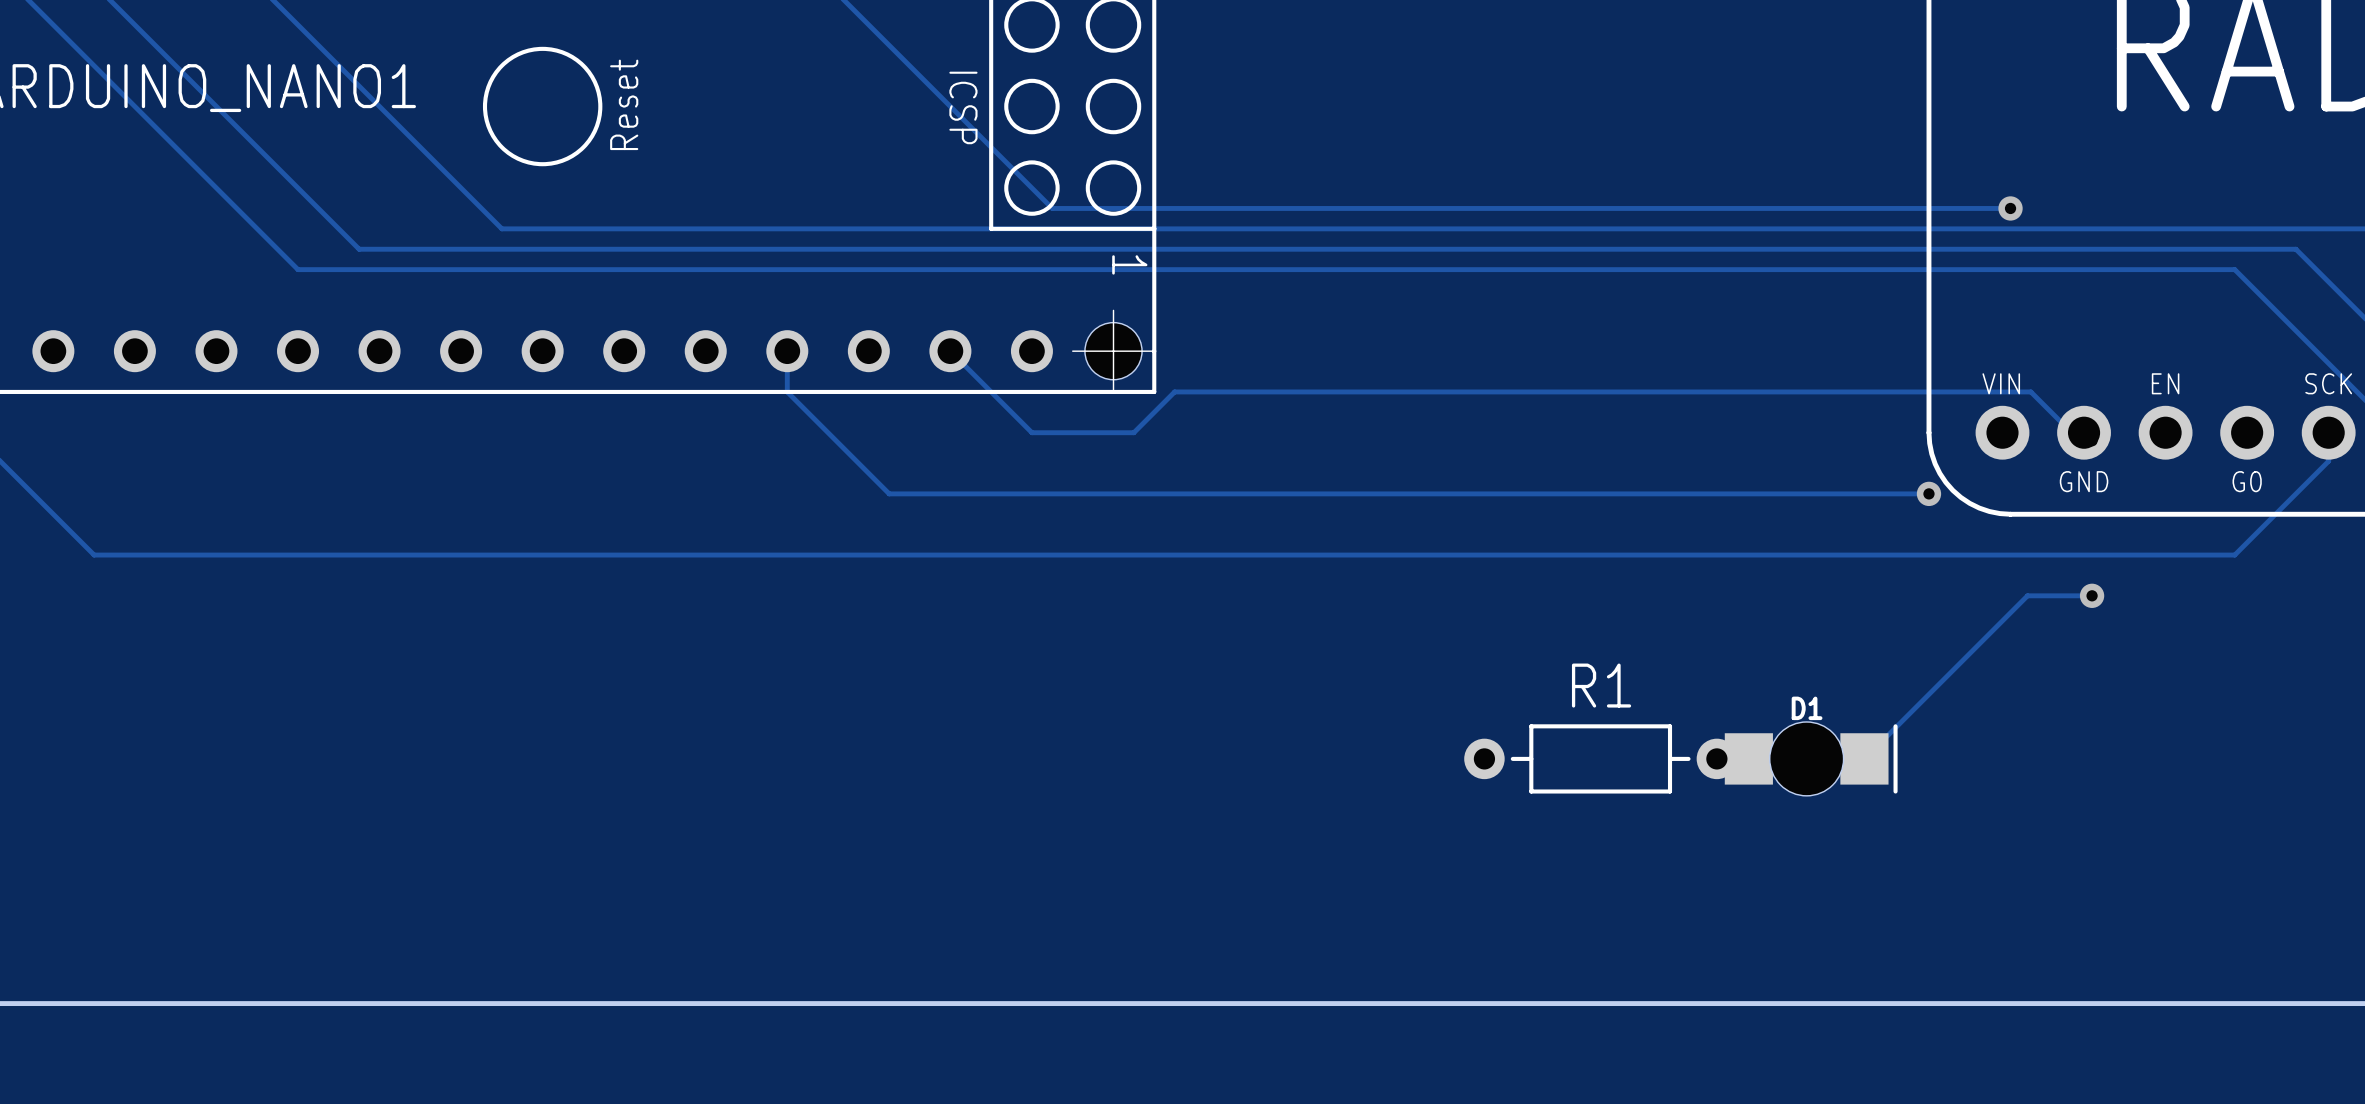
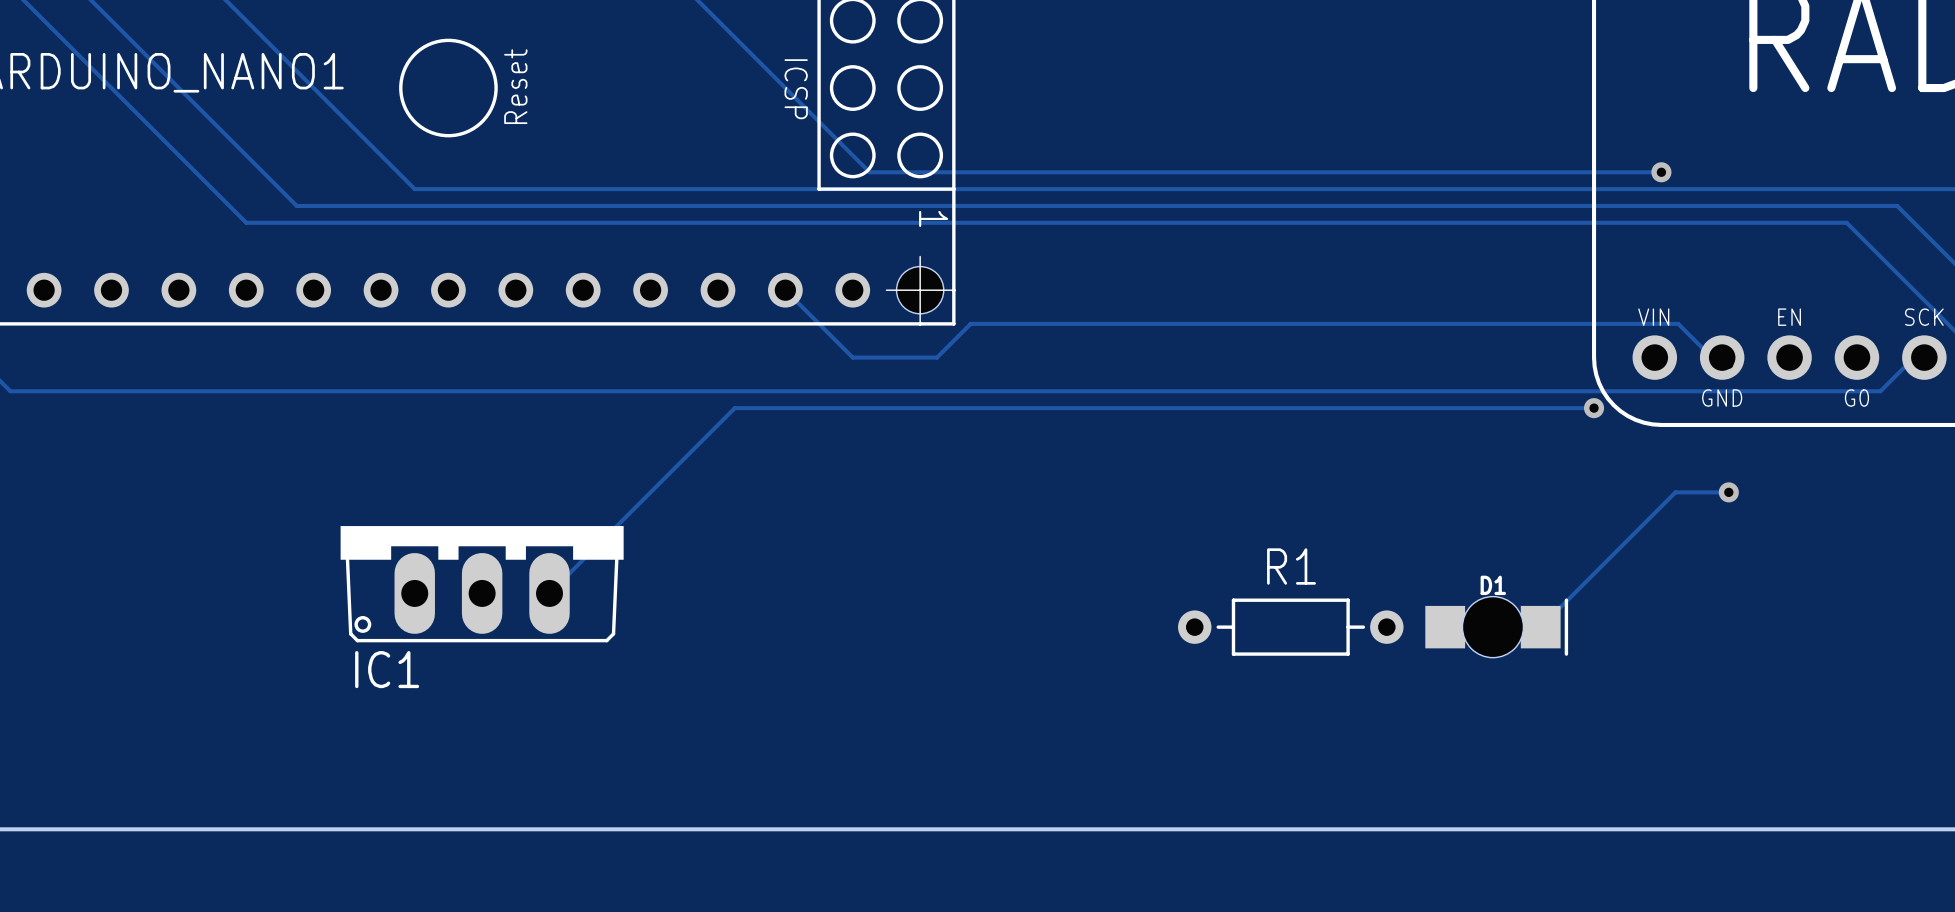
track: (787, 351) (787, 391) (889, 493) -> (549, 593) (734, 408)
track: (2328, 432) (2328, 461) (2234, 555) (94, 555) (12, 473) -> (1924, 357) (1914, 357) (1880, 391) (10, 391)
IC1: none -> (482, 584)
R1 position: (1600, 758) -> (1290, 627)

